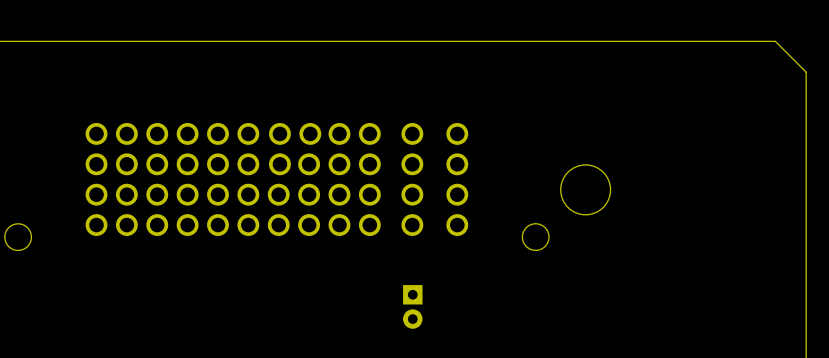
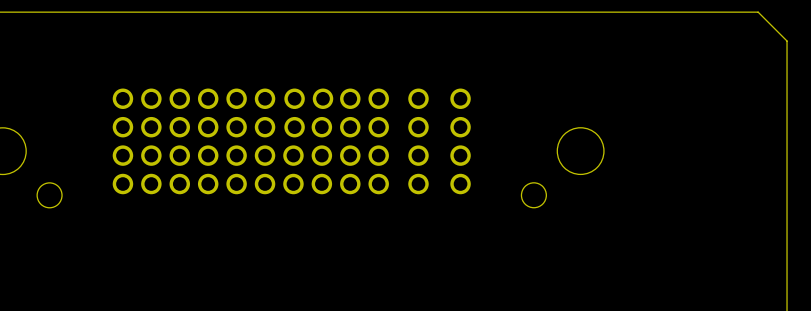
part: (412, 306) -> none

